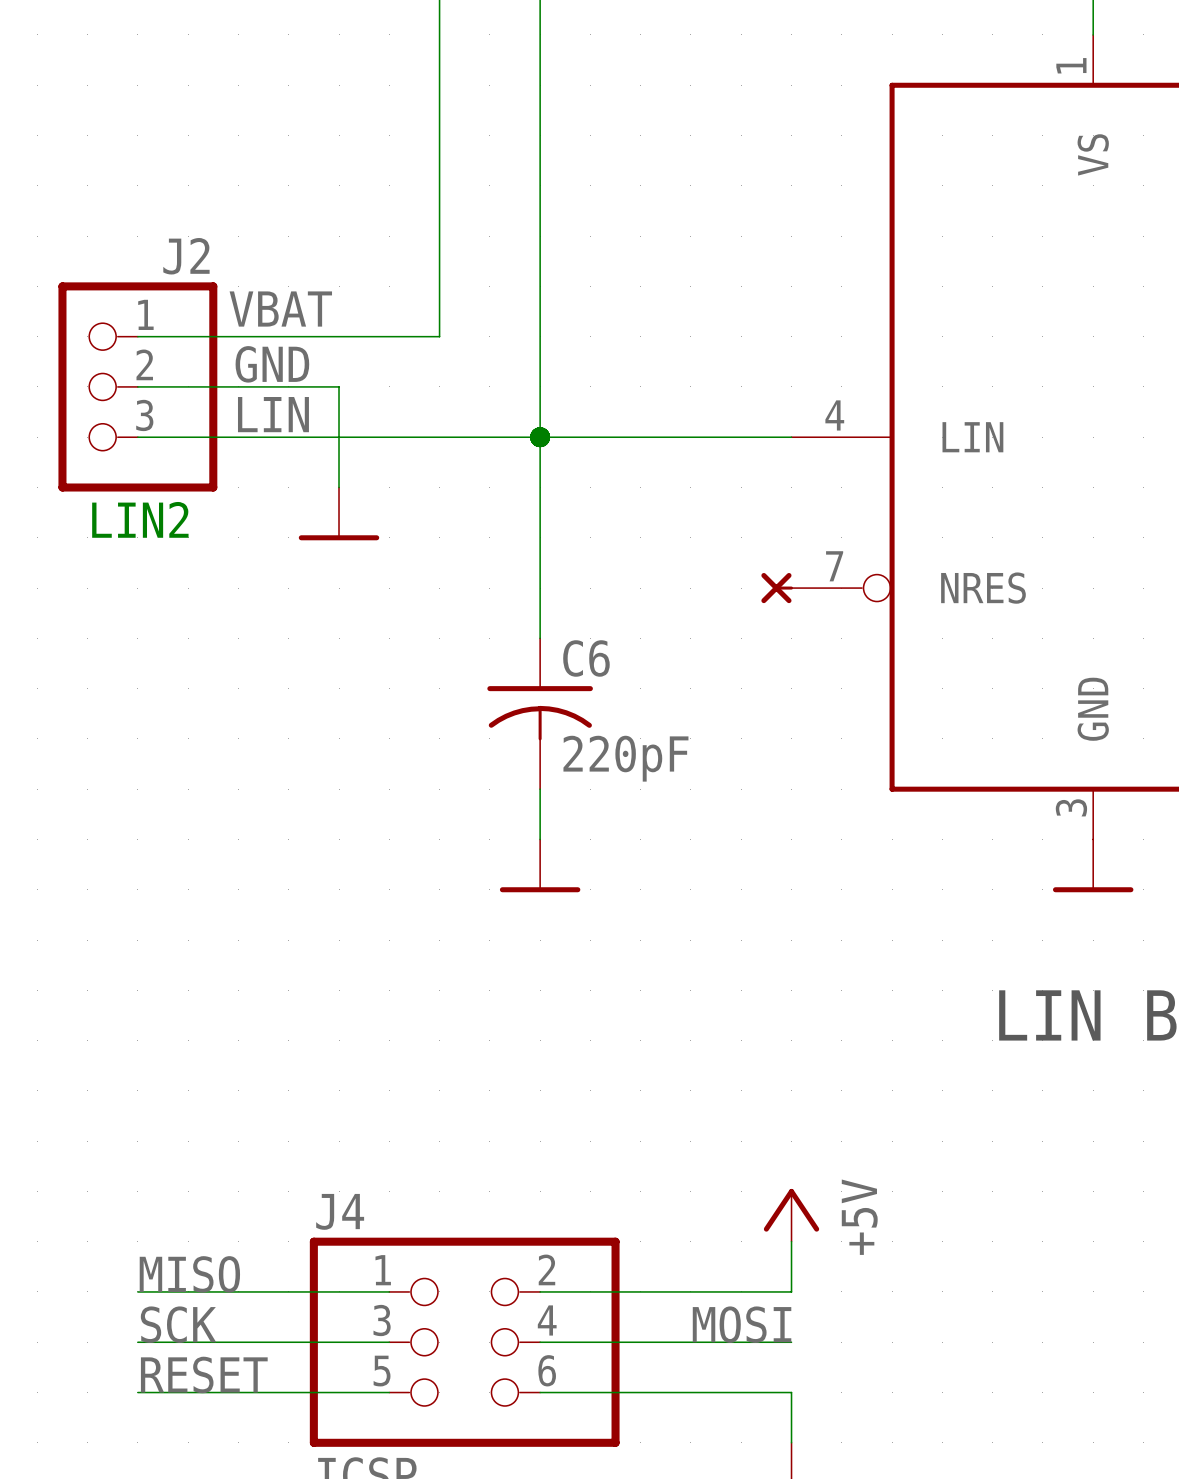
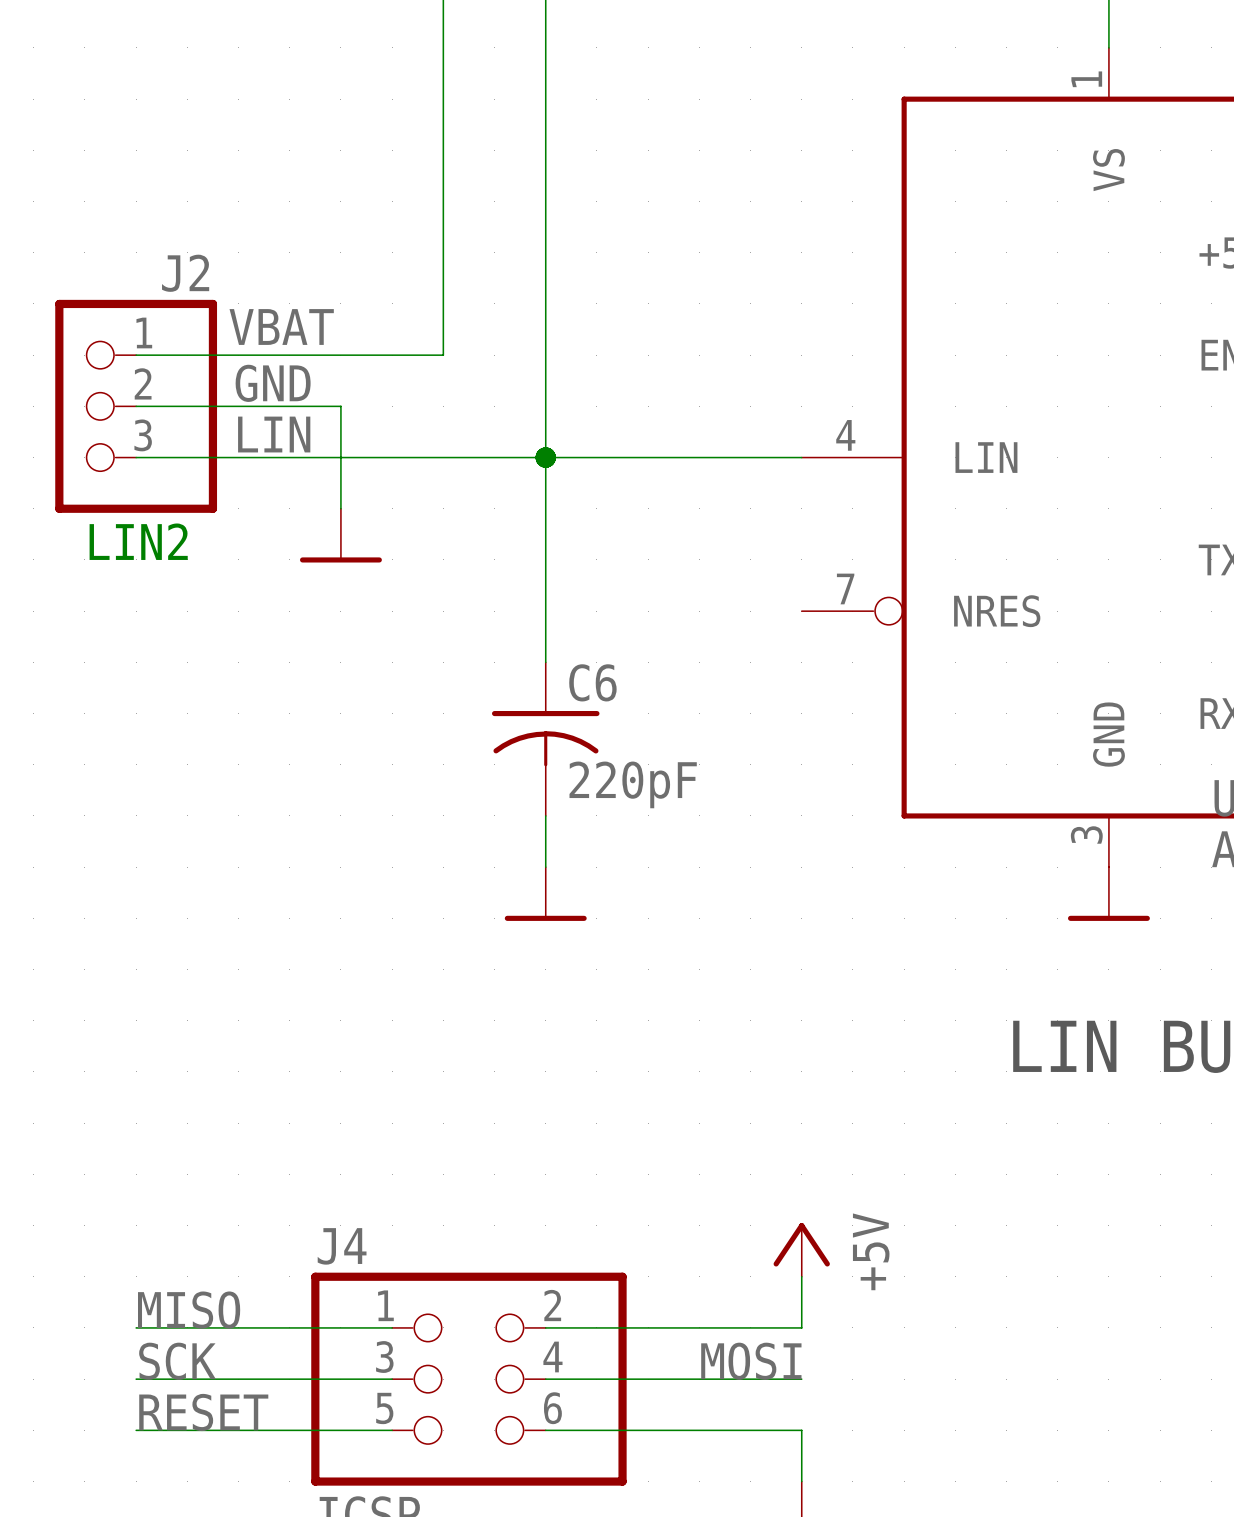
part: (777, 588) -> none

